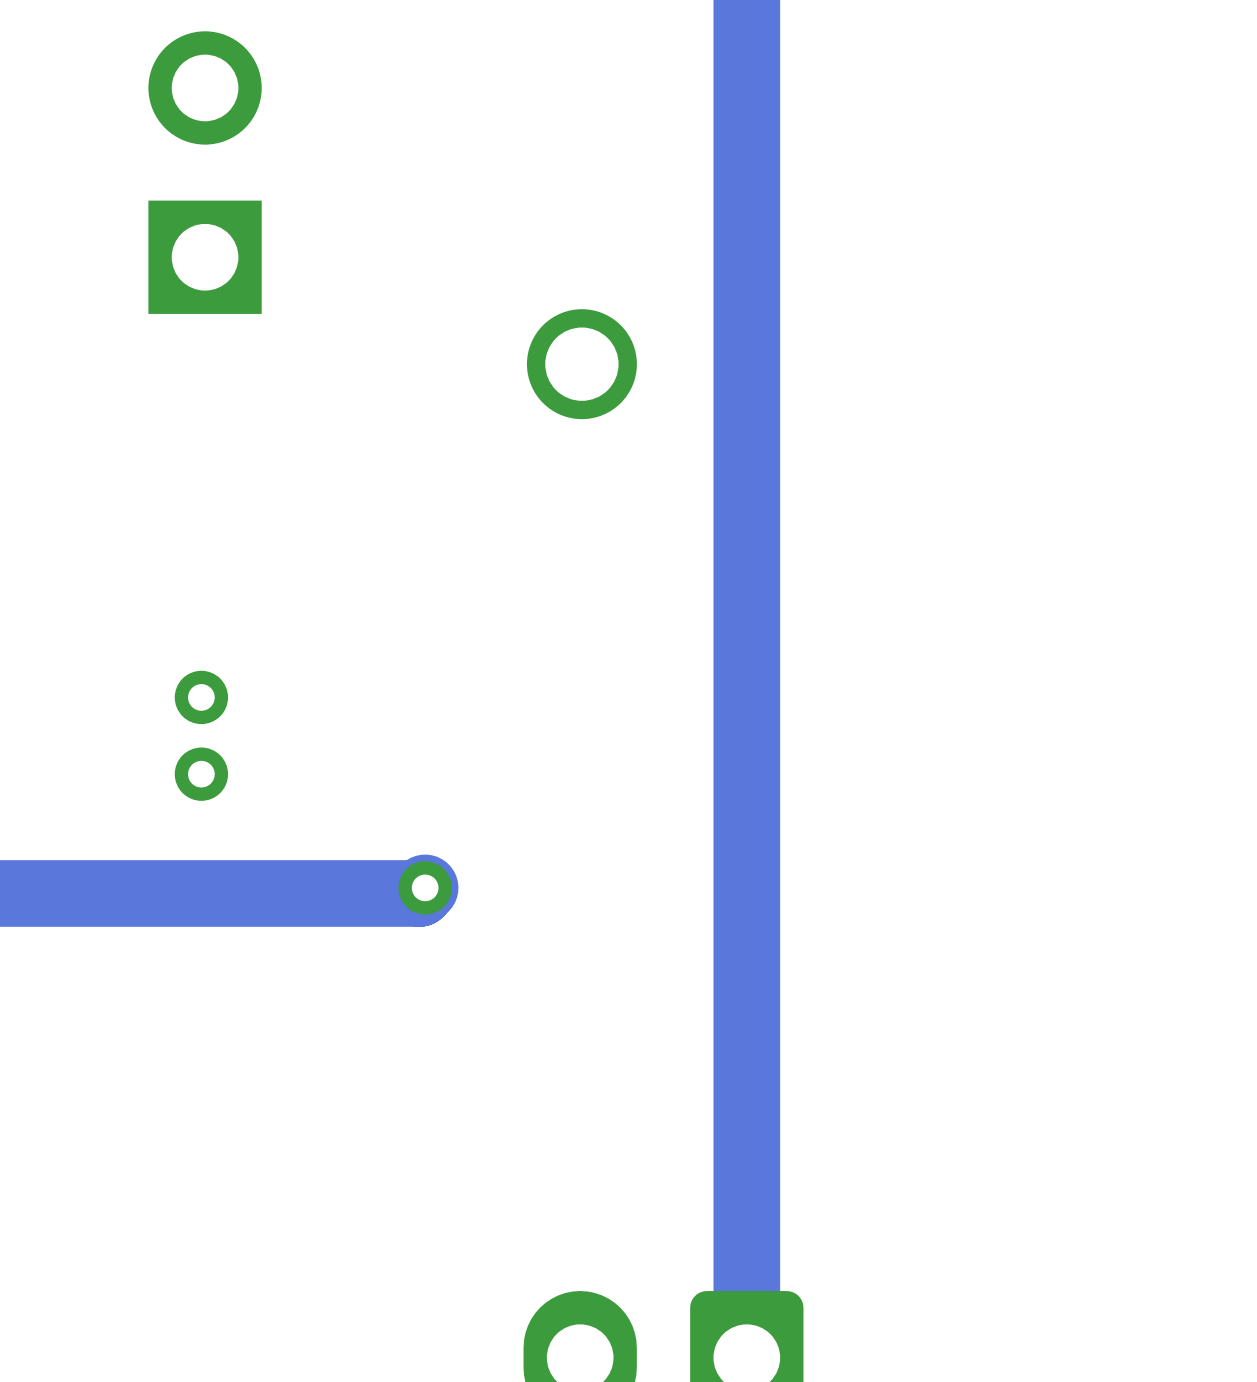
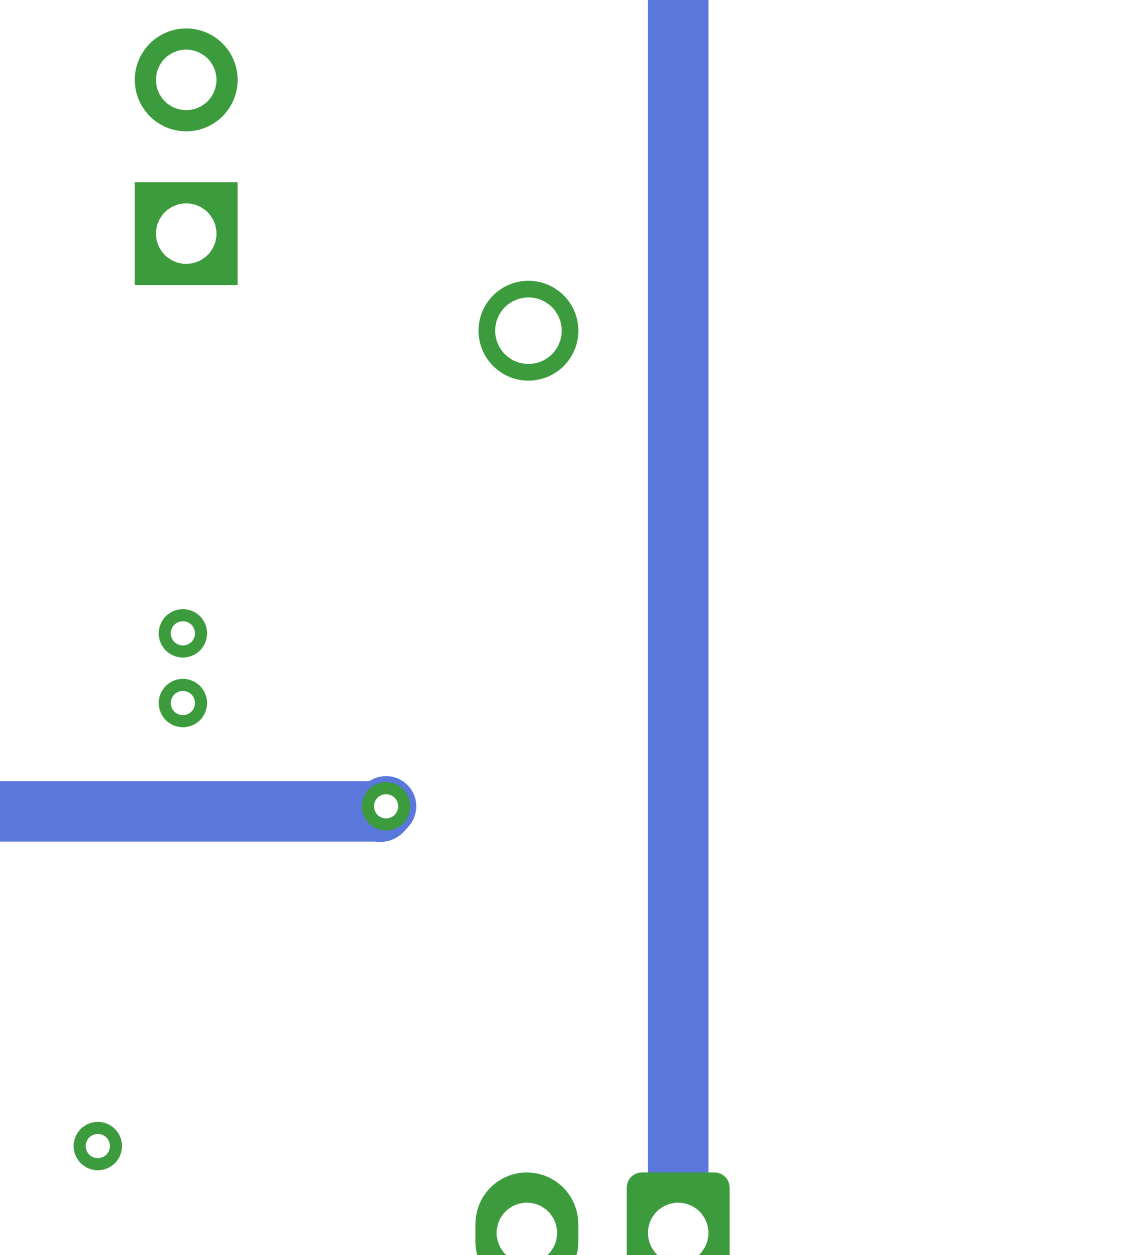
via: none -> (97, 1146)

